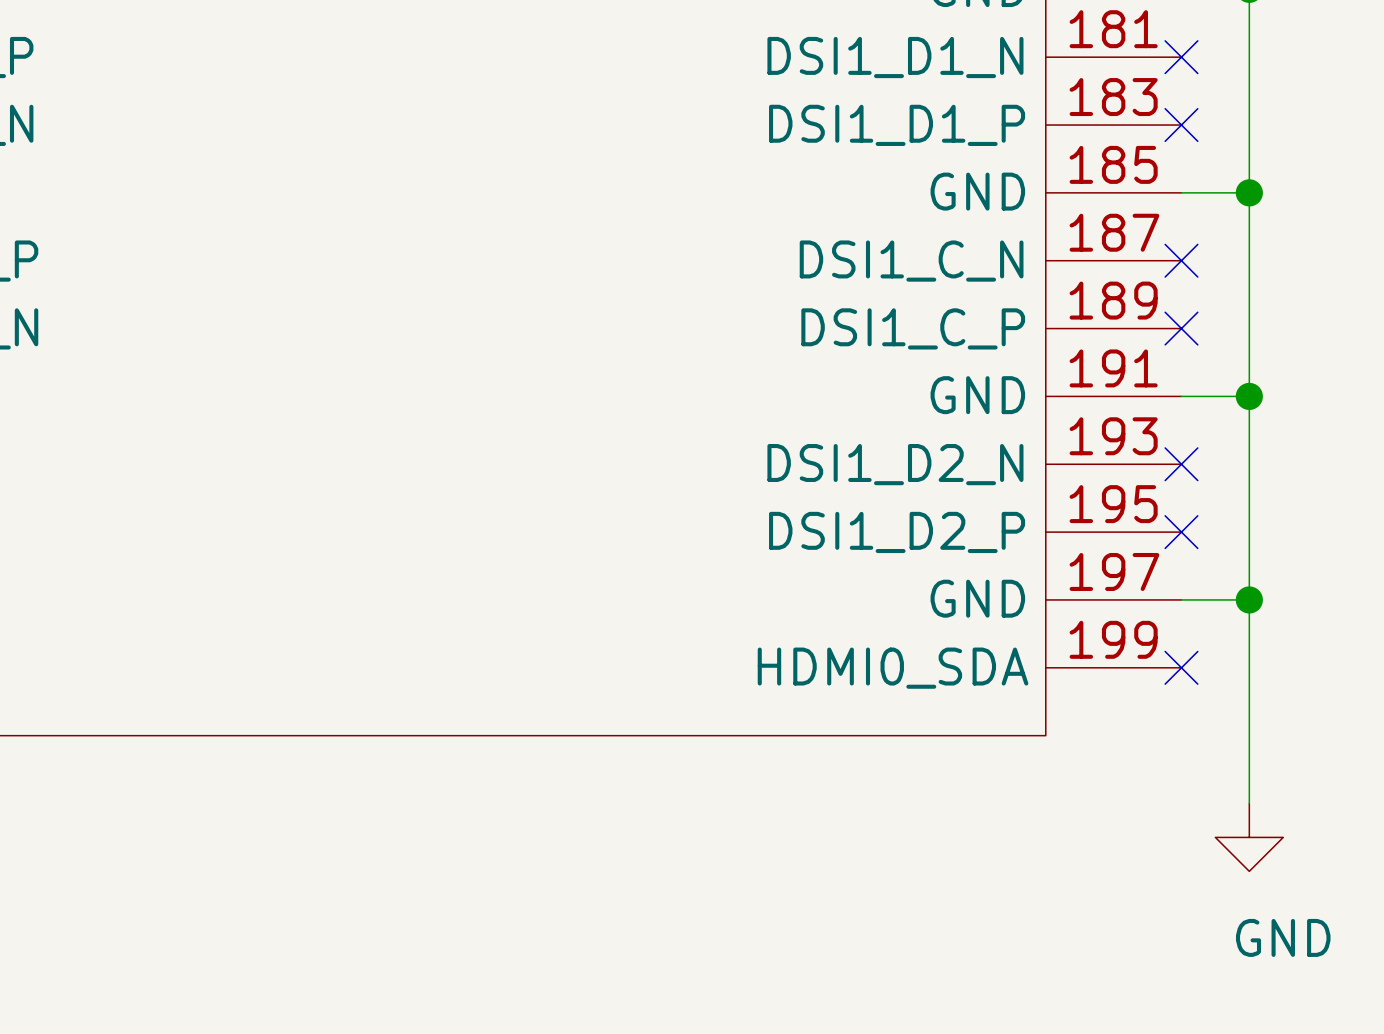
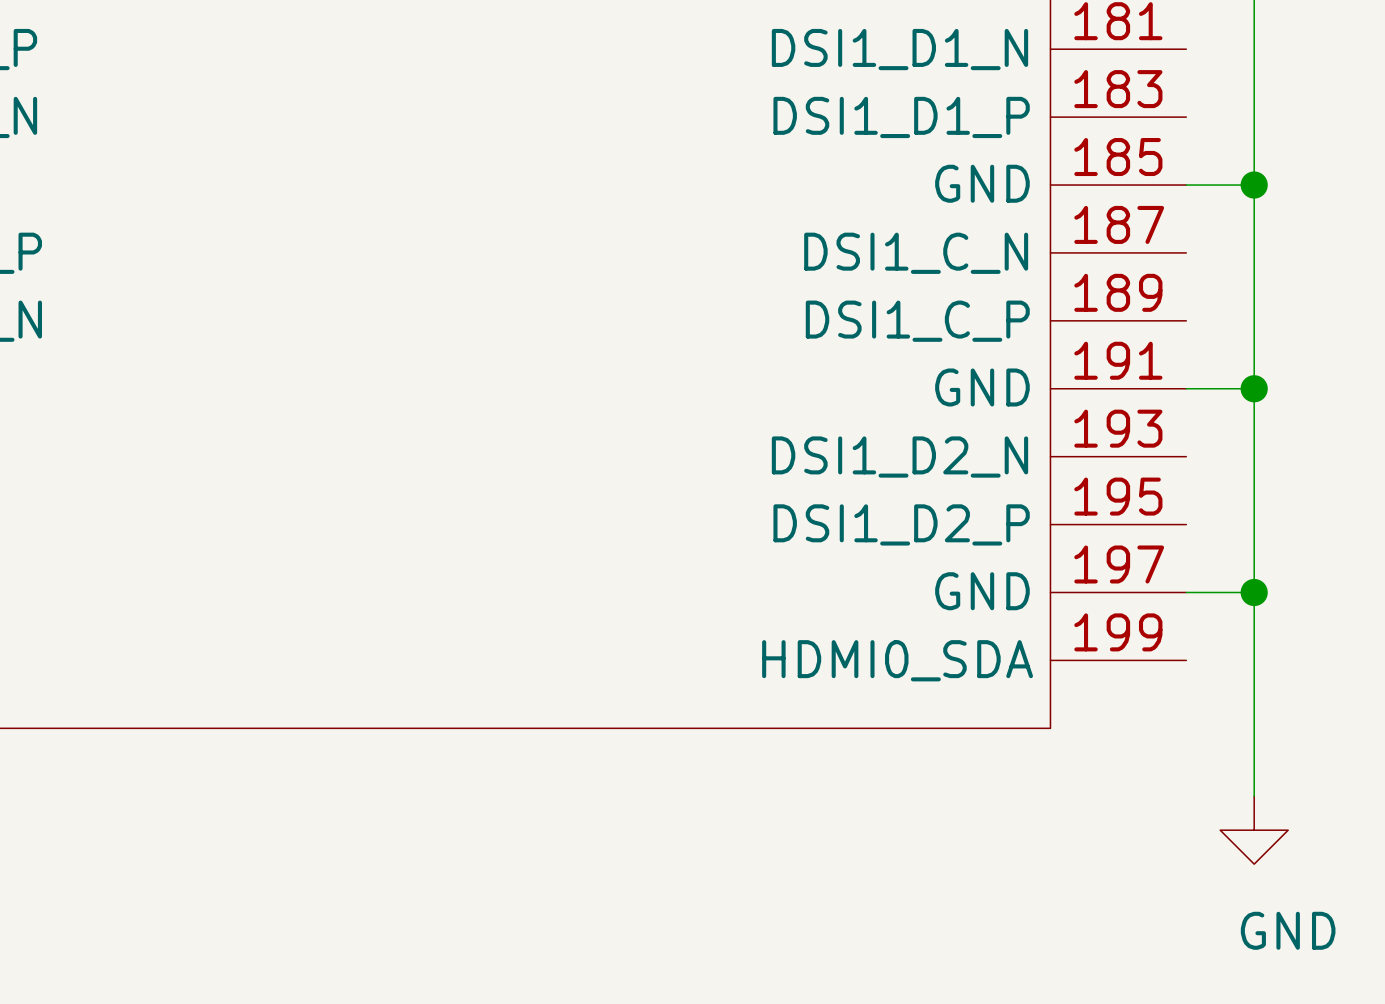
no-connect mark: (1181, 57) -> none
no-connect mark: (1181, 125) -> none
no-connect mark: (1181, 260) -> none
no-connect mark: (1181, 328) -> none
no-connect mark: (1181, 464) -> none
no-connect mark: (1181, 532) -> none
no-connect mark: (1181, 667) -> none

